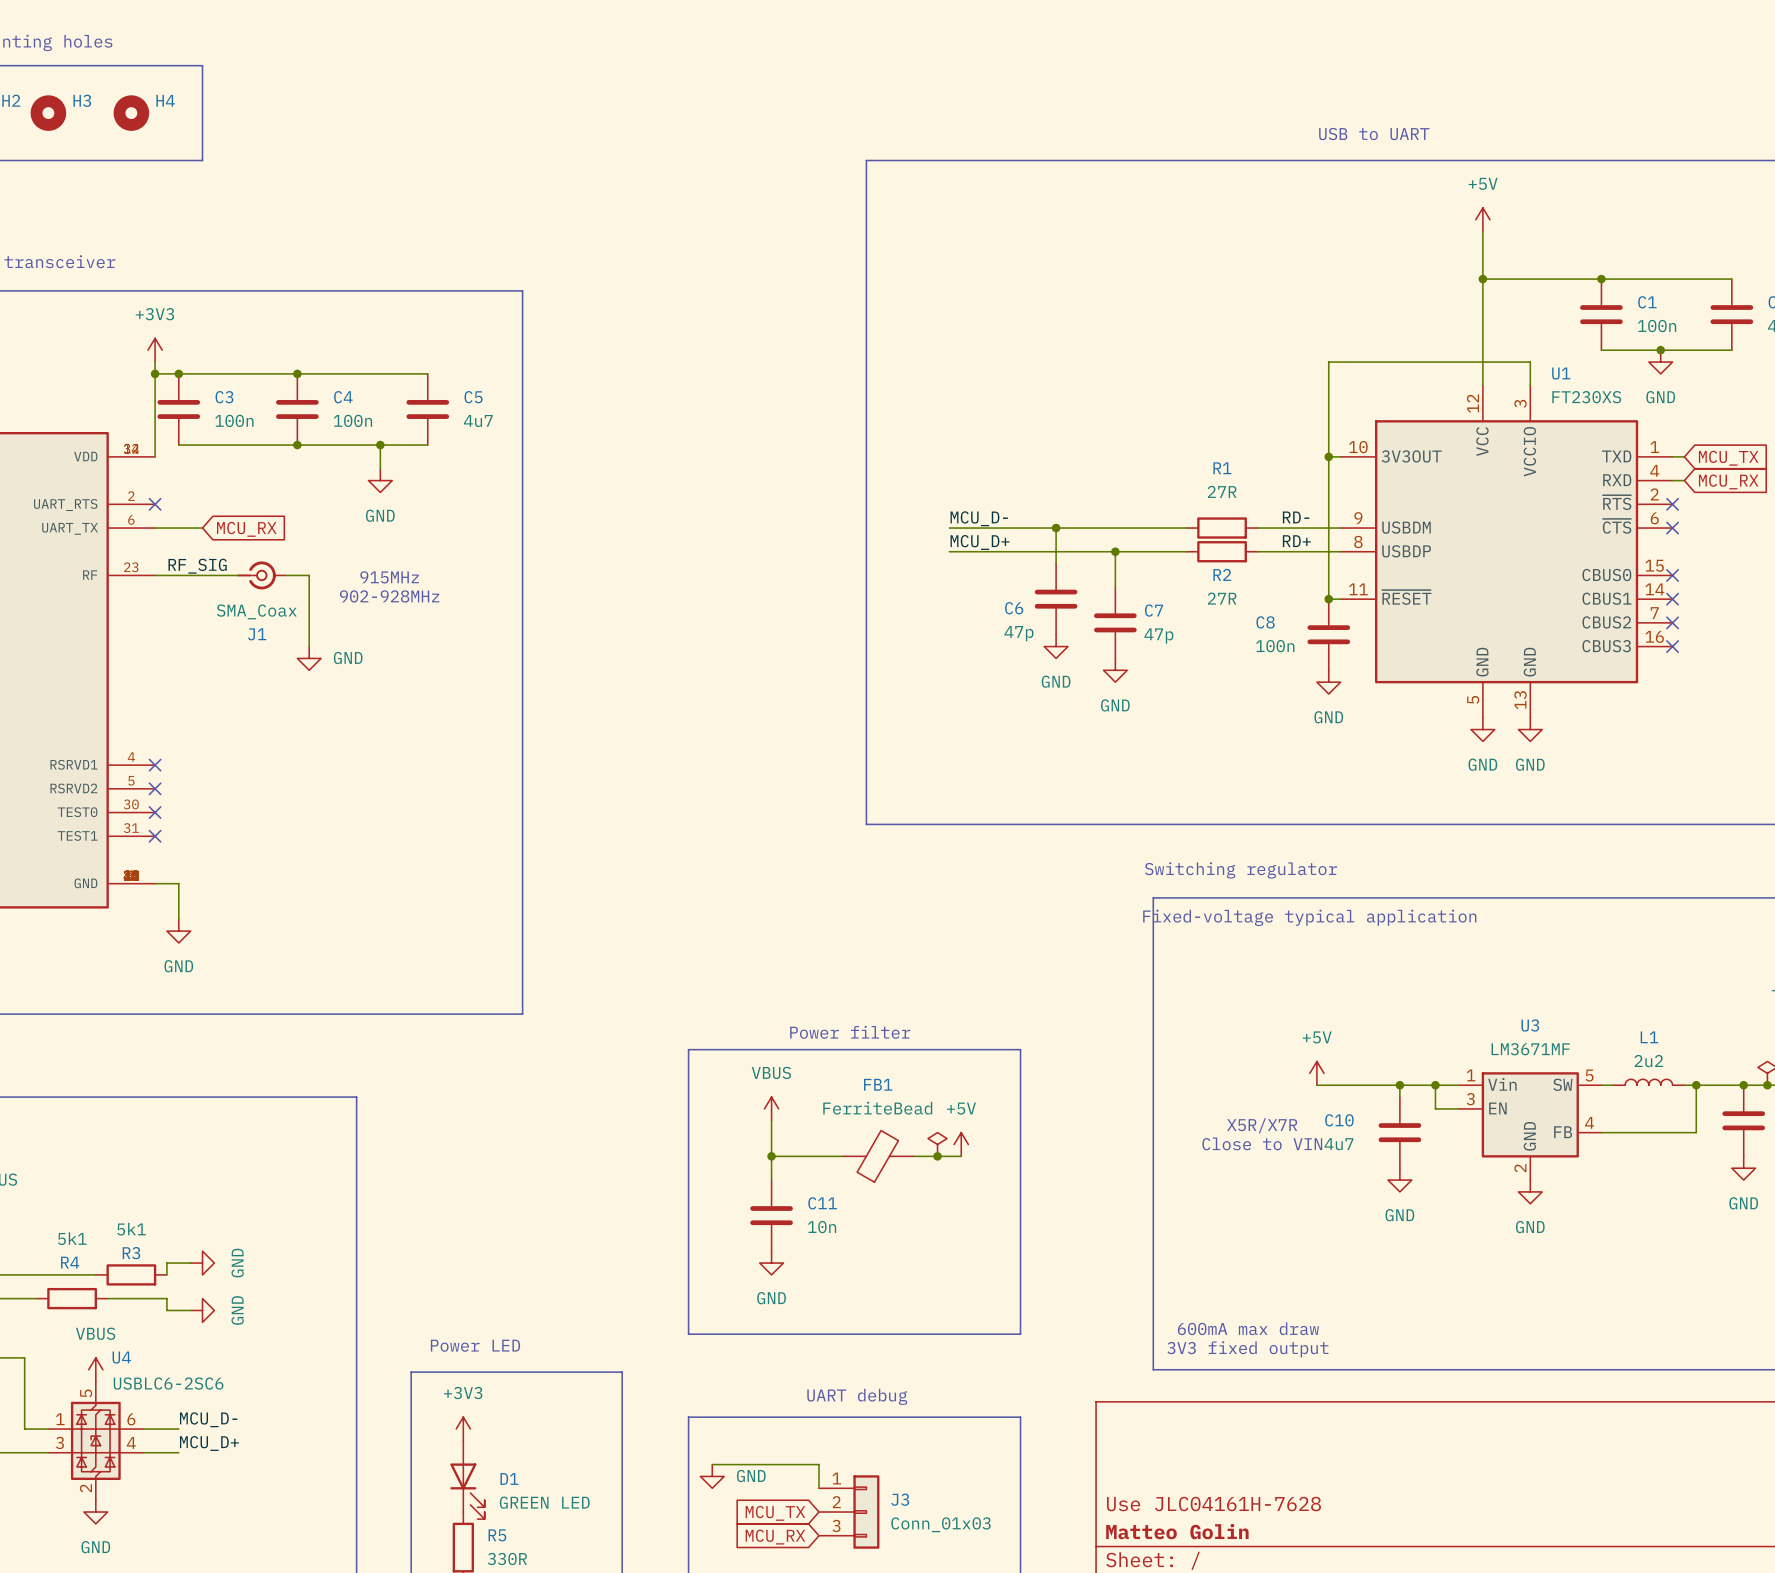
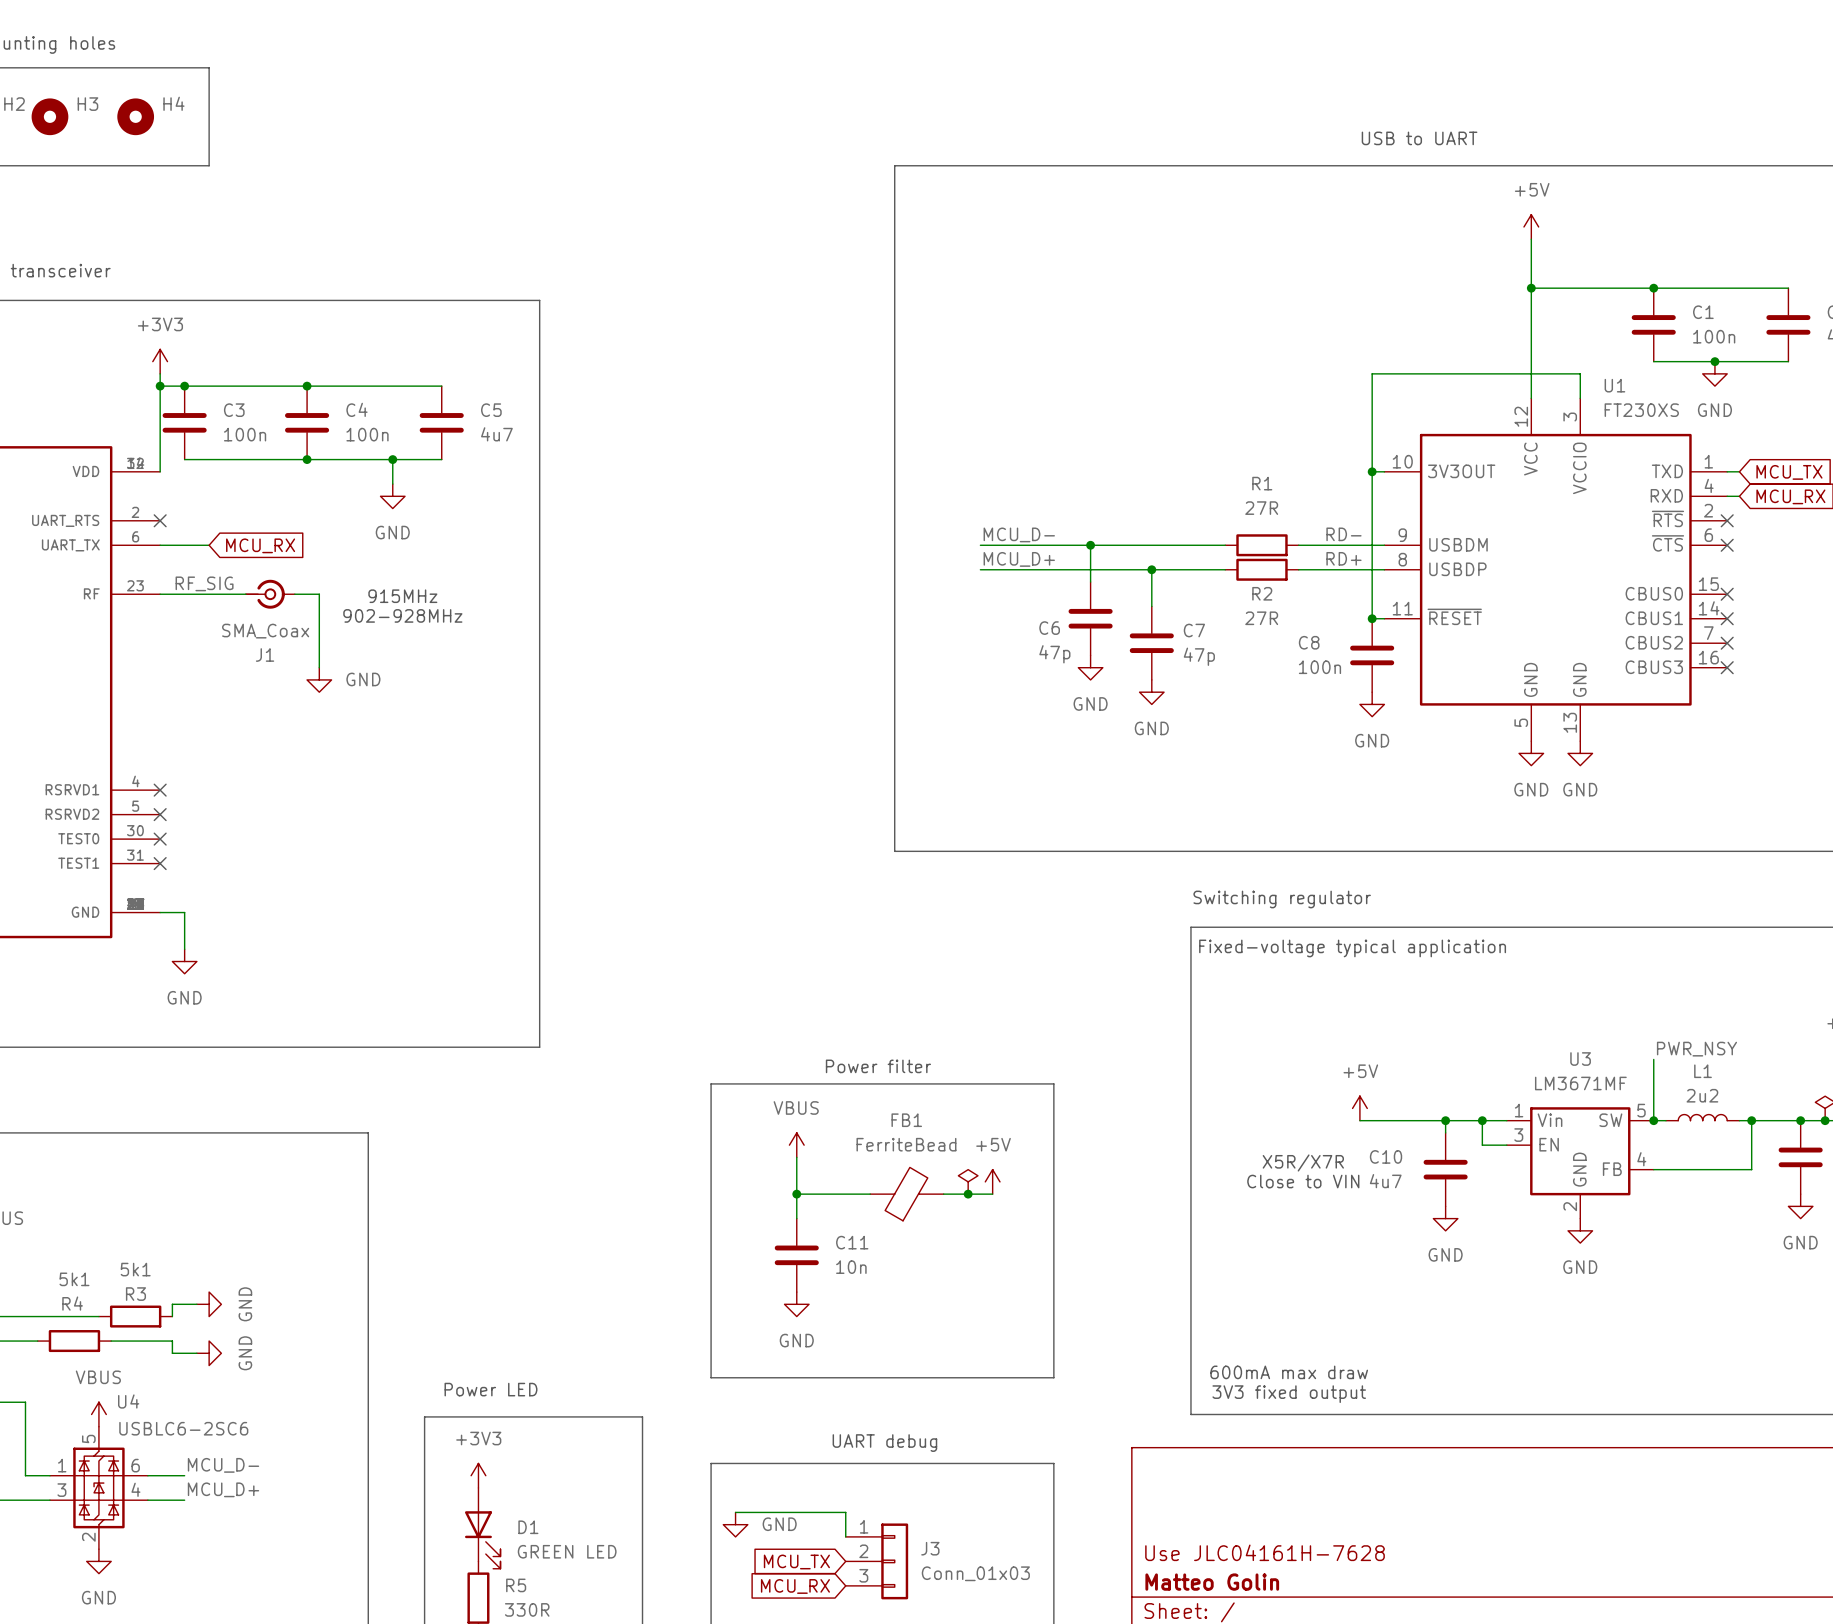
label: none -> PWR_NSY (1696, 1049)
wire: none -> (1653, 1059) (1653, 1120)
junction: none -> (1653, 1120)

